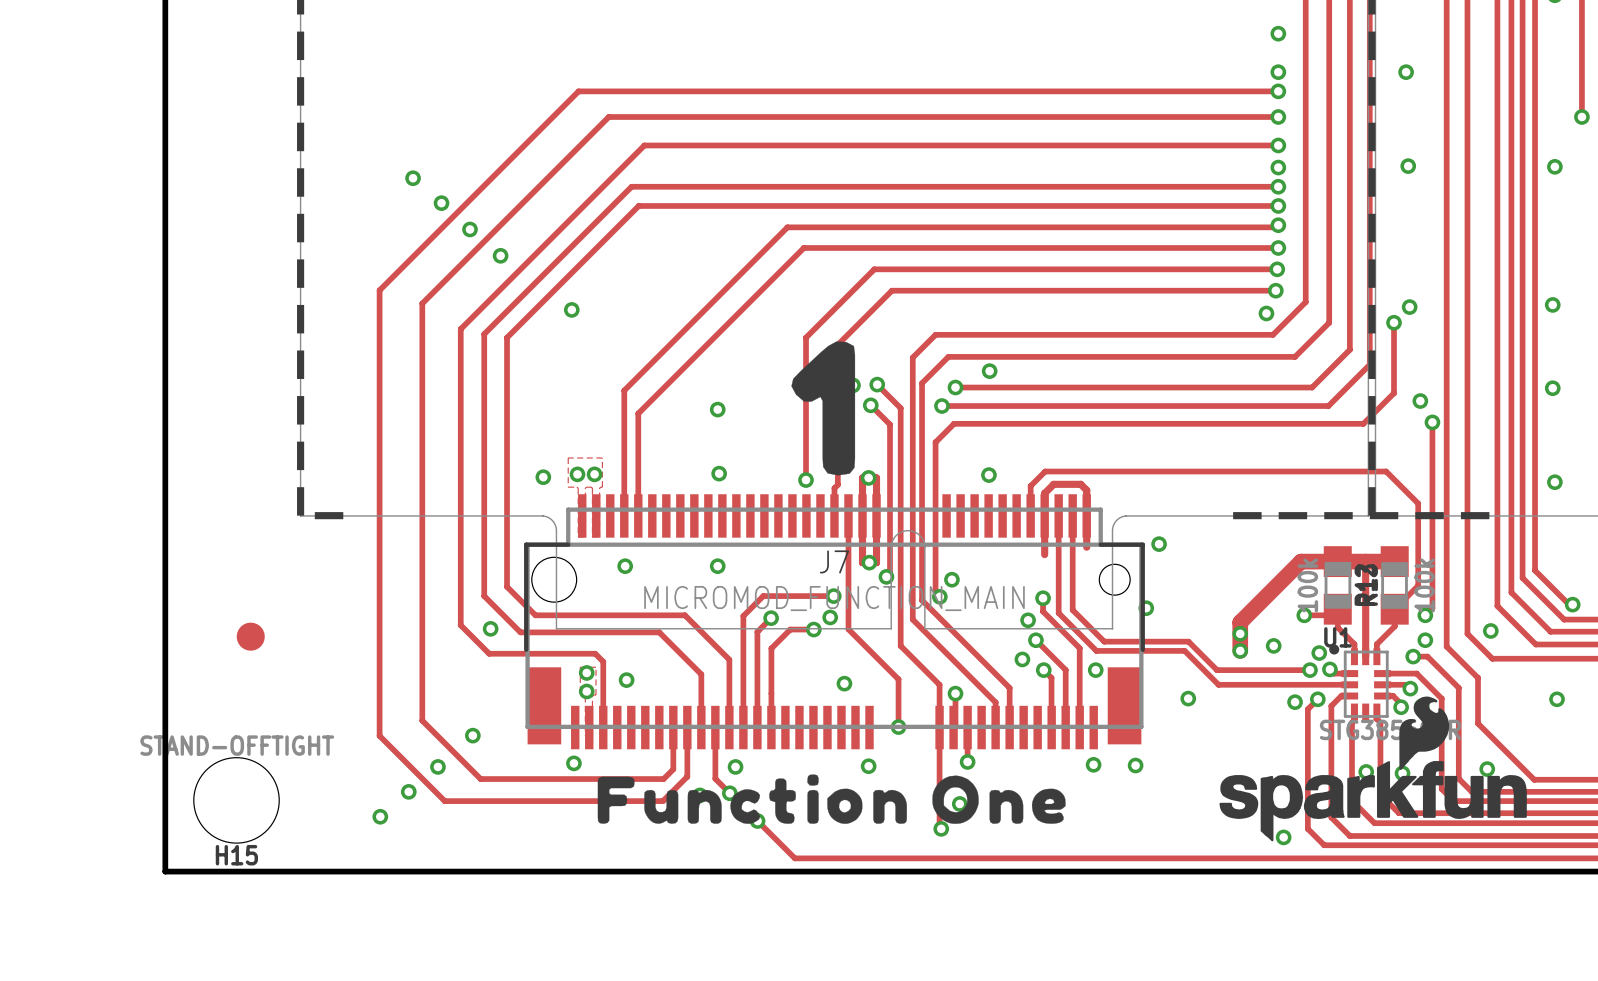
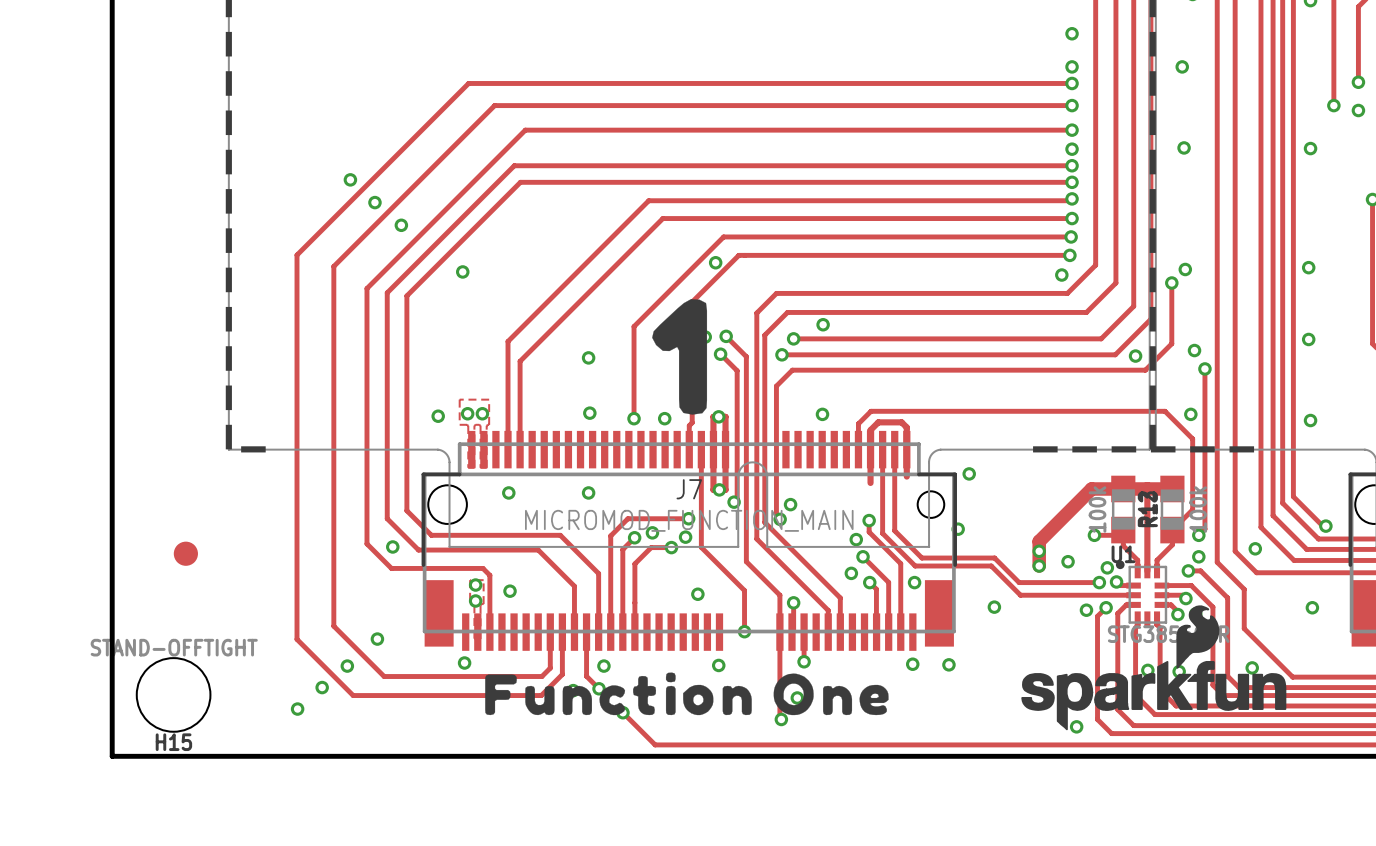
via: (413, 178) -> none
via: none -> (715, 262)
track: (806, 337) (806, 480) -> (664, 295) (634, 326) (634, 418)
via: none -> (1135, 356)
via: none -> (1190, 414)
via: none -> (634, 418)
via: none -> (652, 532)

